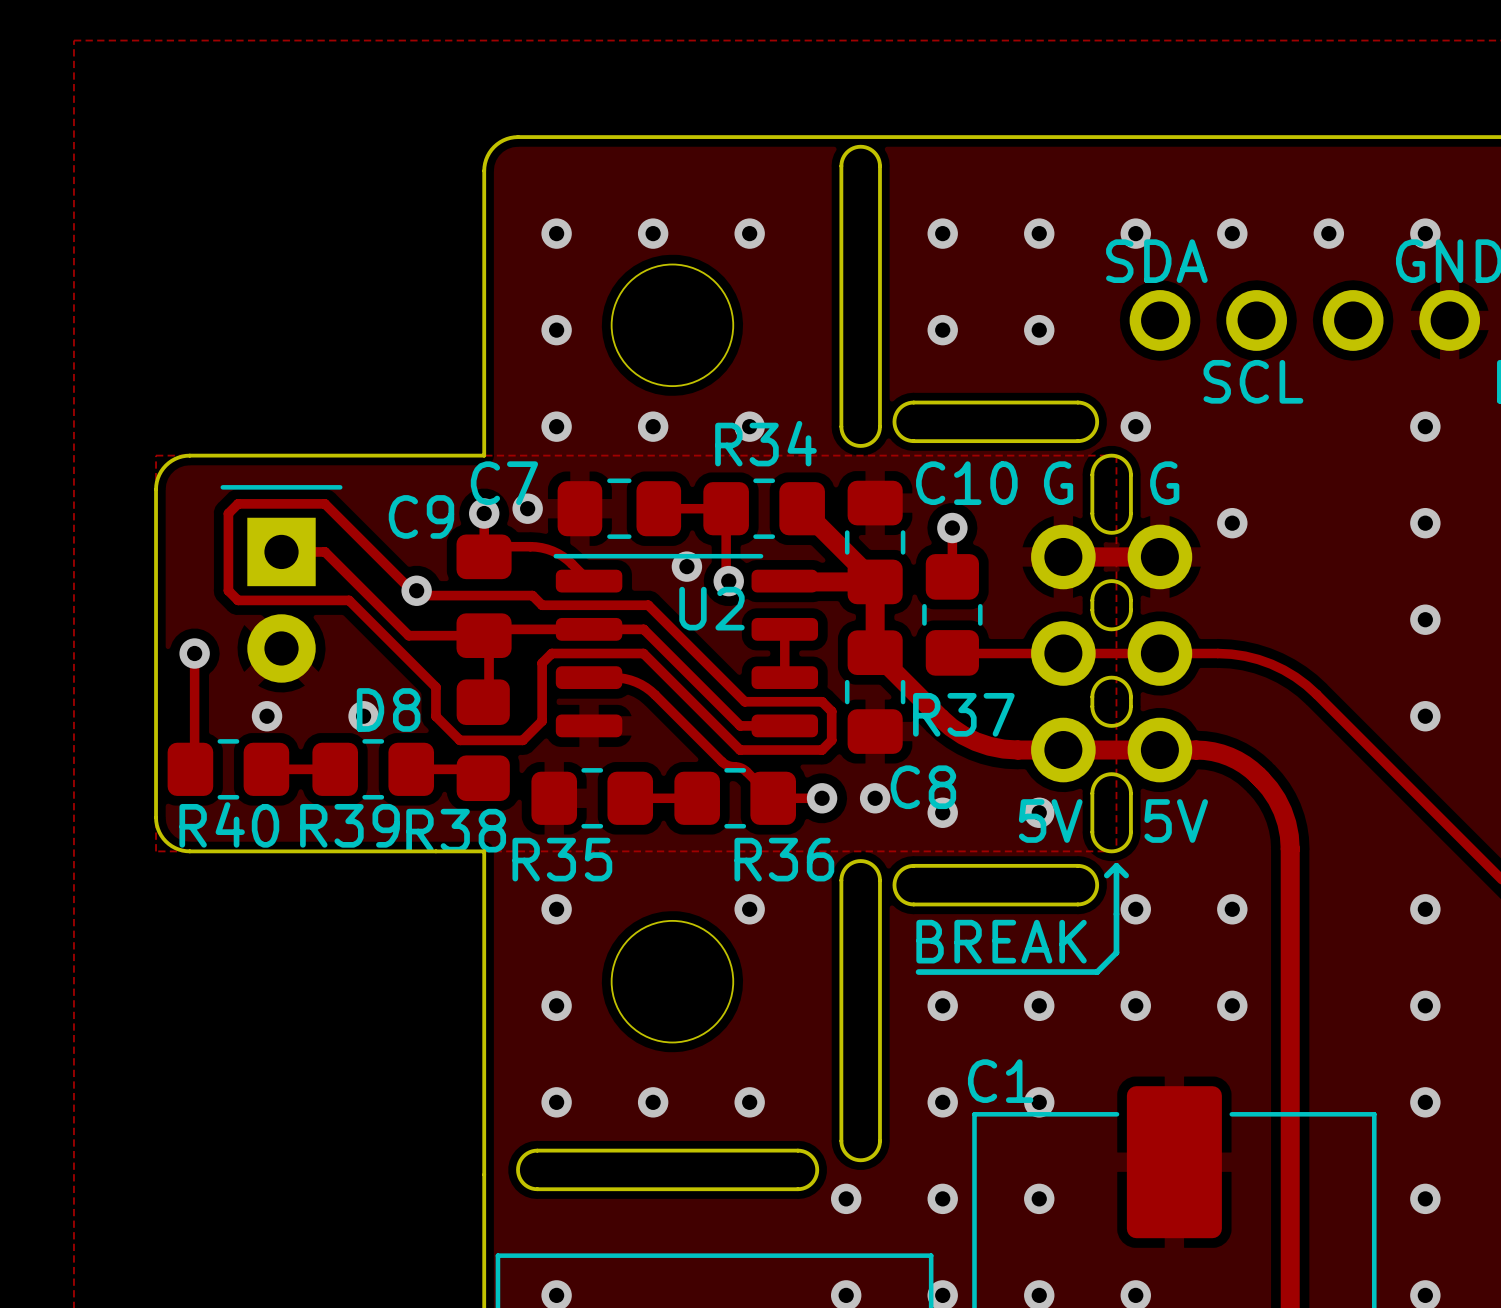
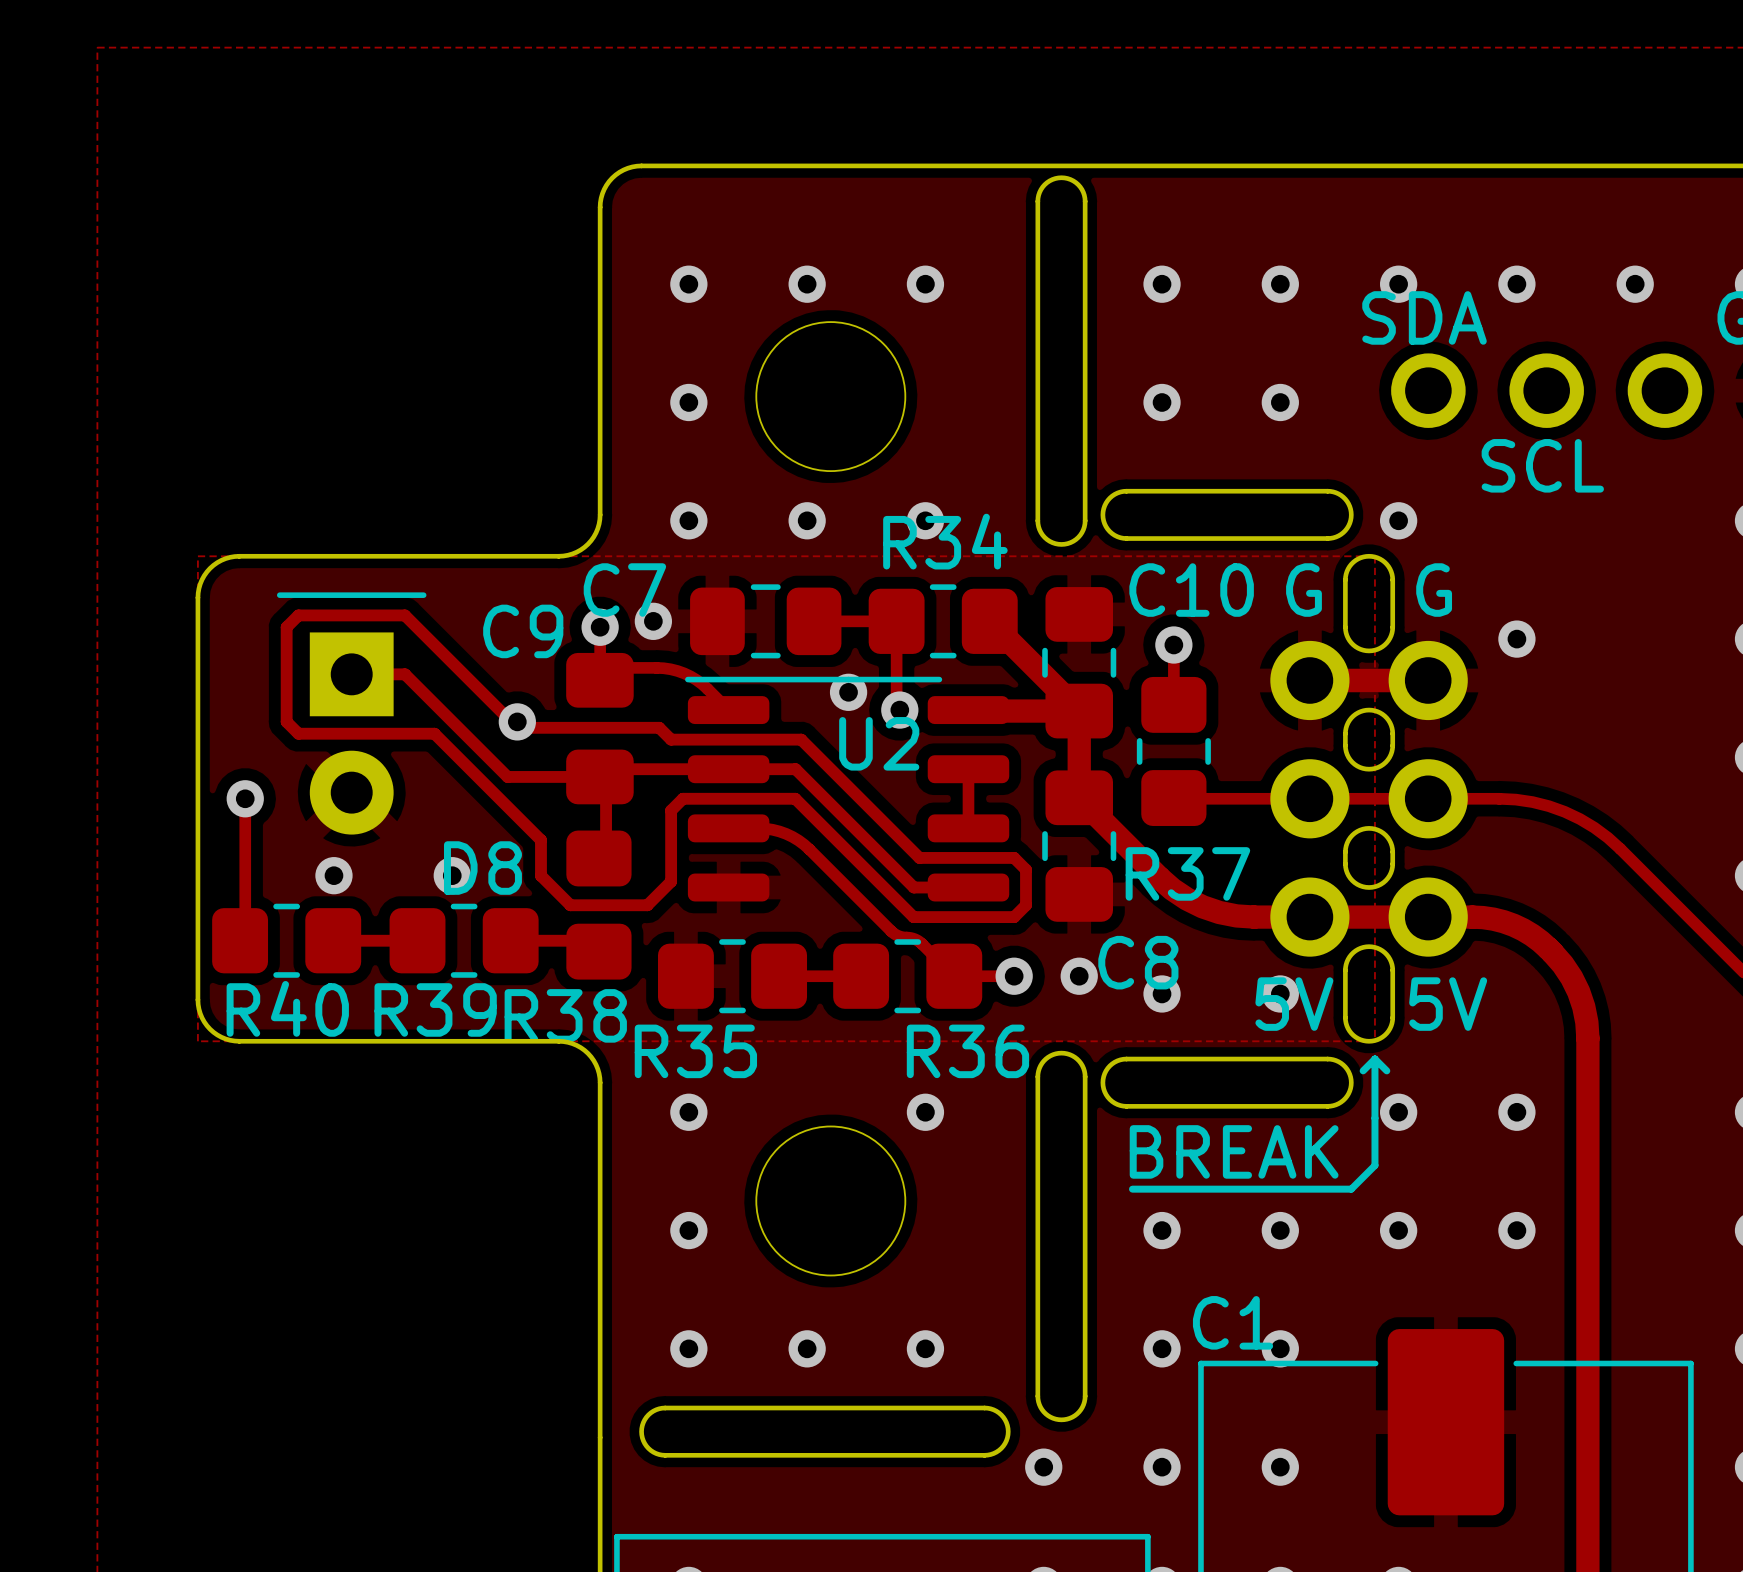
board edge: (484, 421) (484, 455) (450, 455) -> (600, 514) (597, 528) (588, 544) (576, 552) (558, 556)
board edge: (450, 851) (484, 851) (484, 885) -> (558, 1041) (572, 1043) (588, 1053) (596, 1064) (600, 1082)

